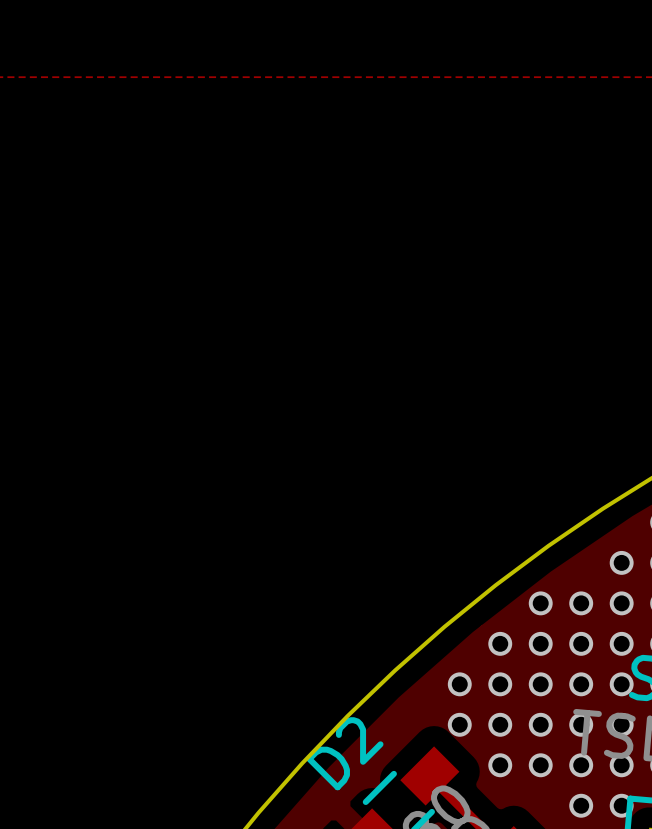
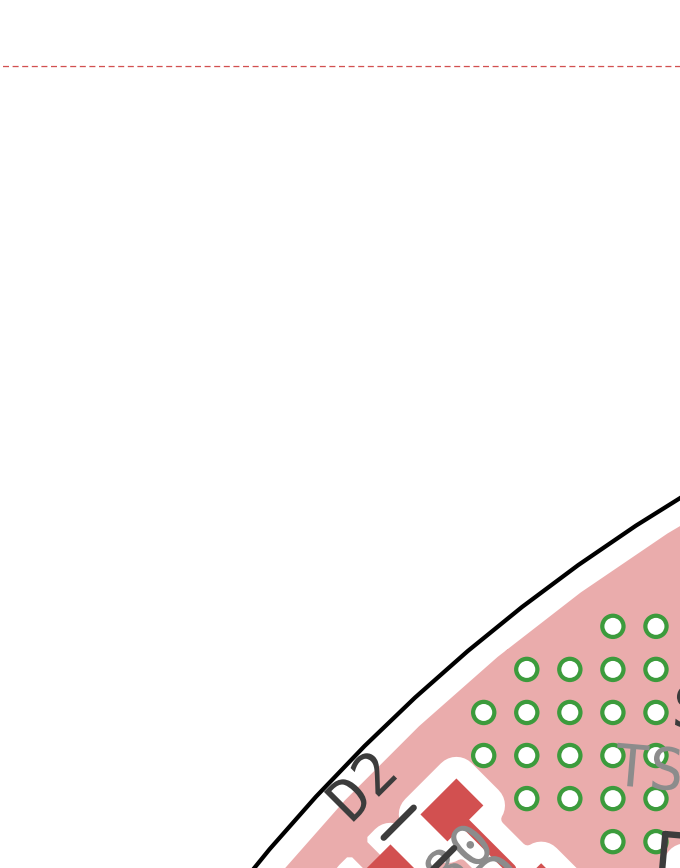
via: (621, 562) -> none
via: (540, 603) -> none

